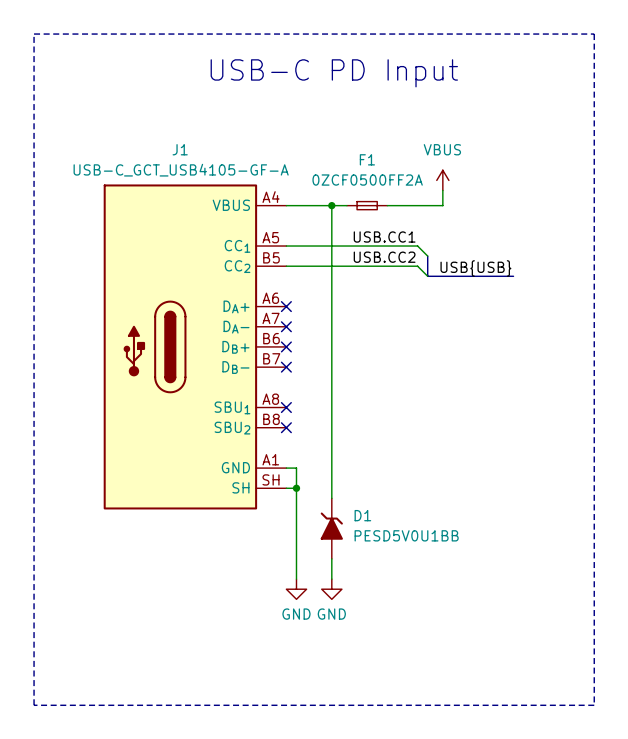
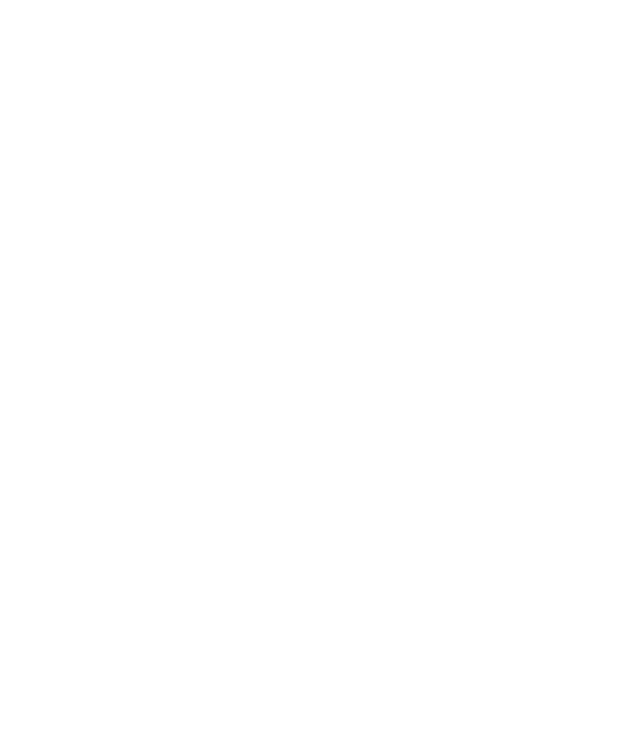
line: (34, 34) (594, 34) (594, 705) (34, 705) (34, 34) -> none
text: USB-C PD Input (334, 73) -> none
power symbol: VBUS (442, 180) -> none
wire: (442, 190) (442, 205) (387, 205) -> none
wire: (286, 205) (346, 205) -> none
wire: (331, 205) (331, 498) -> none
junction: (331, 205) -> none
F1: (367, 205) -> none
label: USB.CC1 (384, 237) -> none
wire: (286, 246) (417, 246) (427, 256) -> none
bus: (427, 256) (427, 276) (513, 276) -> none
label: USB.CC2 (384, 257) -> none
wire: (286, 266) (417, 266) (427, 276) -> none
label: USB{USB} (475, 268) -> none
no-connect mark: (286, 306) -> none
no-connect mark: (286, 326) -> none
J1: USB-C_GCT_USB4105-GF-A (195, 346) -> none
no-connect mark: (286, 346) -> none
no-connect mark: (286, 367) -> none
no-connect mark: (286, 407) -> none
no-connect mark: (286, 427) -> none
wire: (286, 468) (296, 468) (296, 579) -> none
wire: (286, 488) (296, 488) -> none
junction: (296, 488) -> none
D1: PESD5V0U1BB (331, 528) -> none
wire: (331, 558) (331, 579) -> none
power symbol: GND (296, 589) -> none
power symbol: GND (331, 589) -> none

